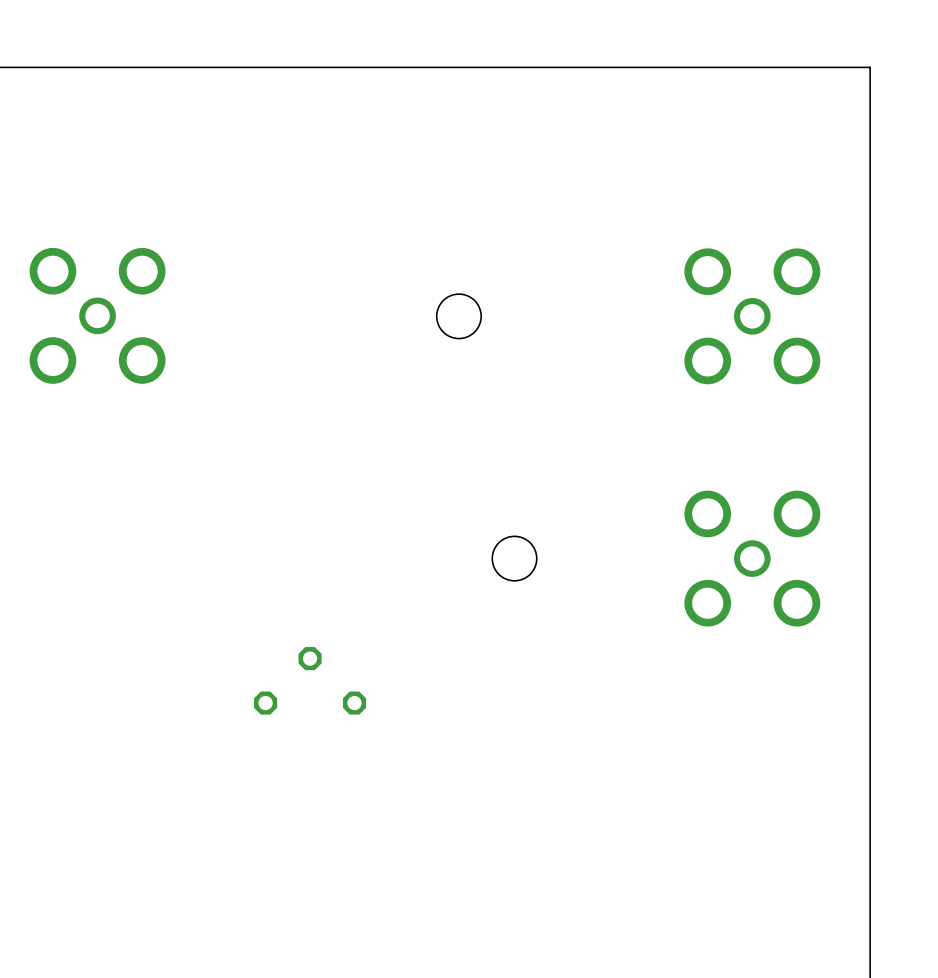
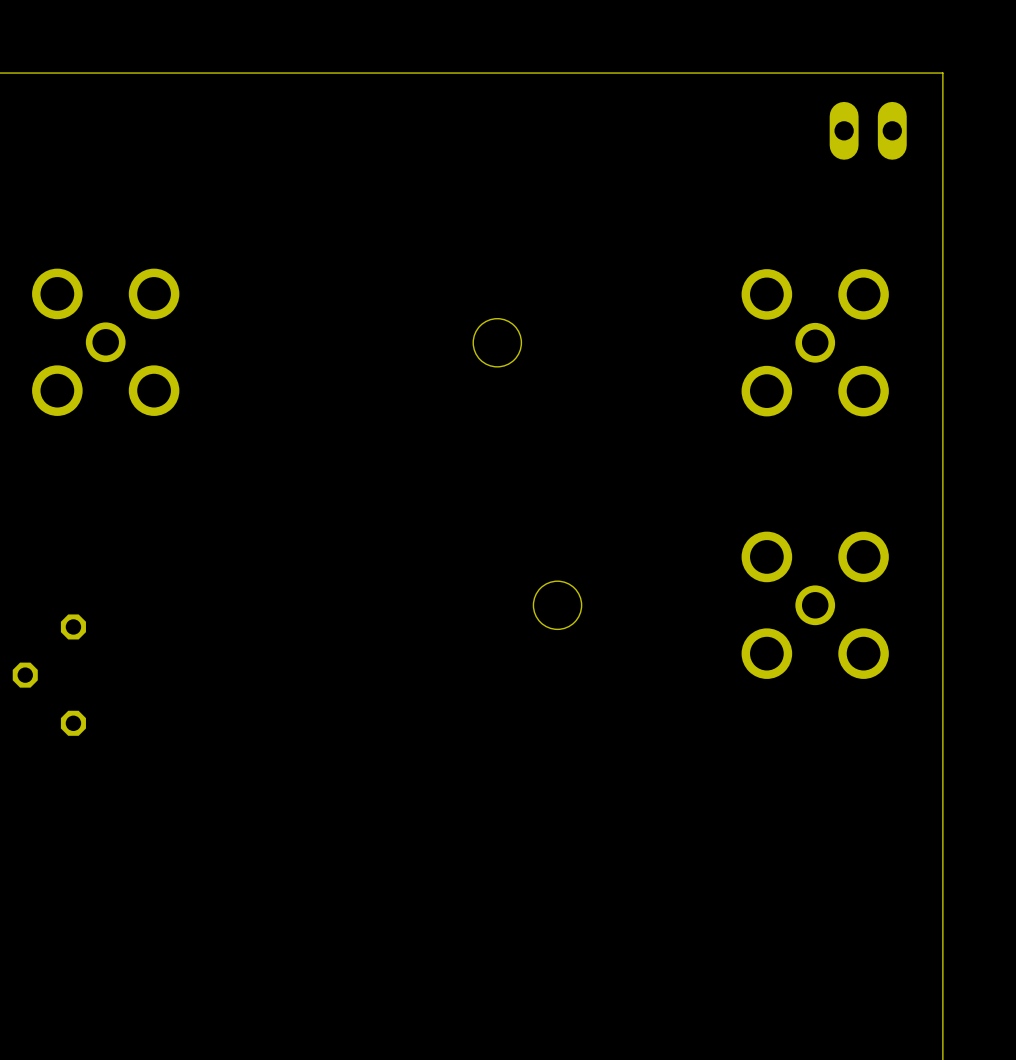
part: none -> (868, 130)
part rotation: 0° (310, 680) -> 90° counterclockwise (49, 675)
part position: (310, 680) -> (49, 675)

